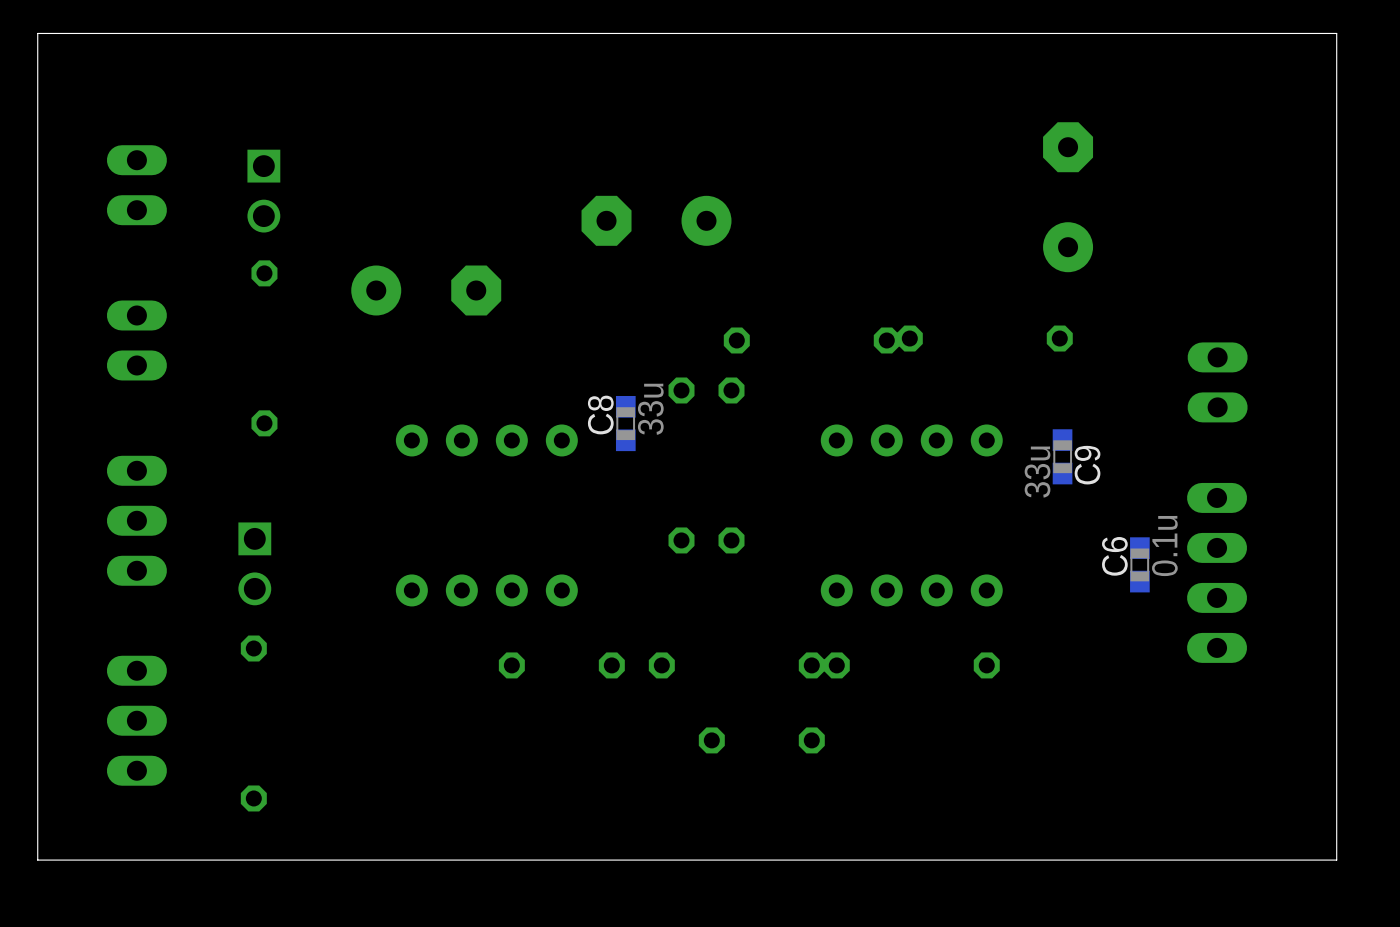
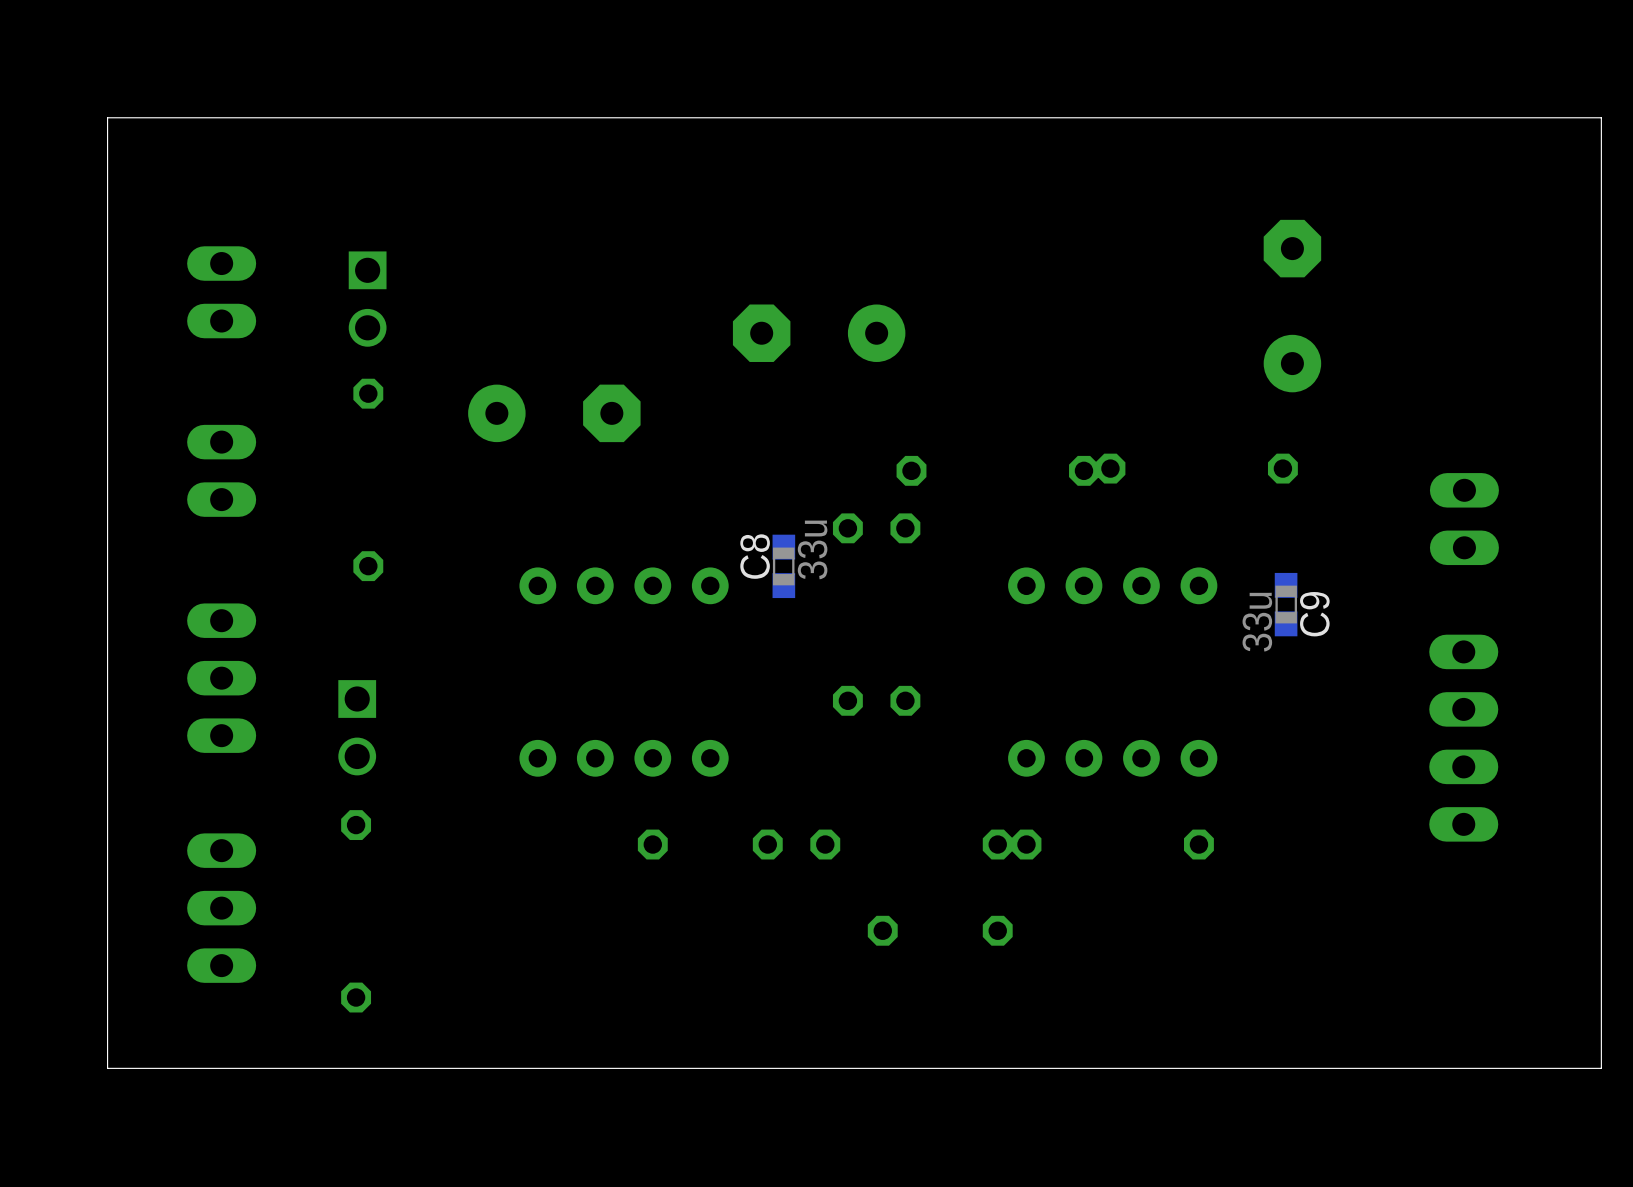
C6: 0.1u (1139, 564) -> none

